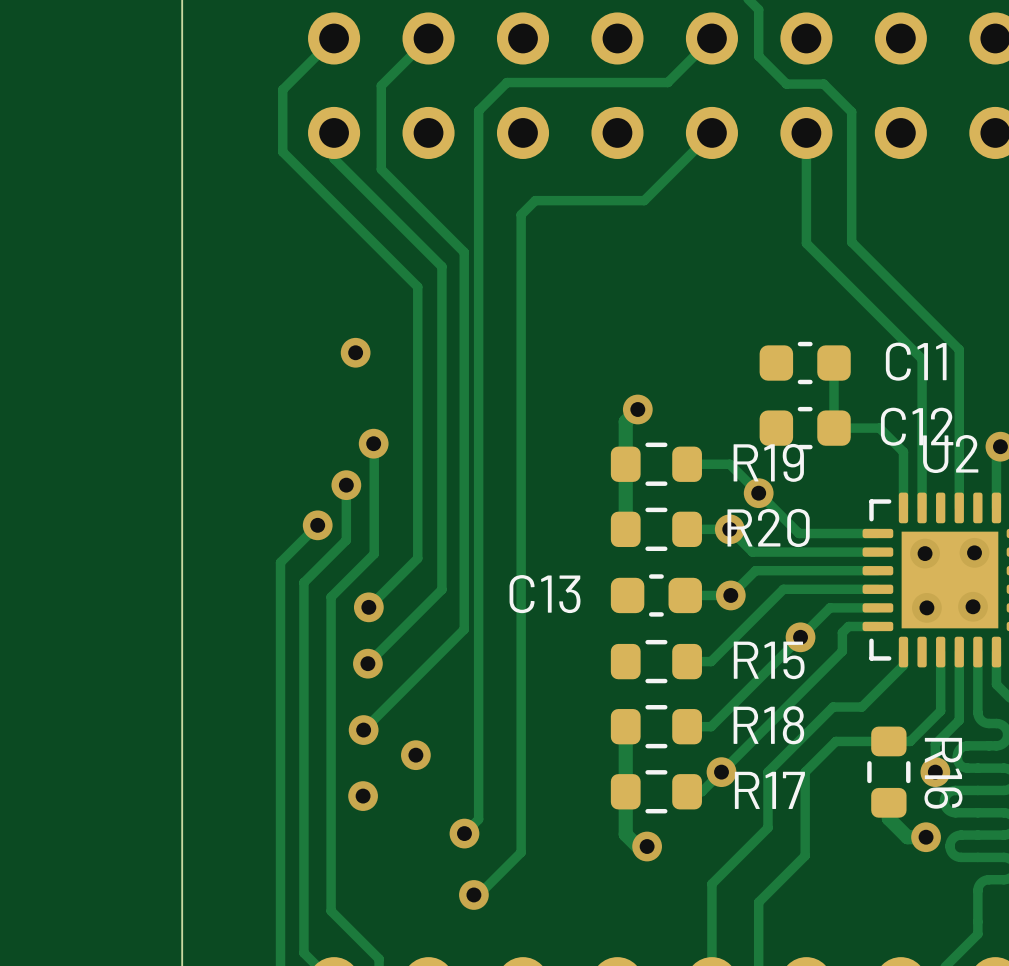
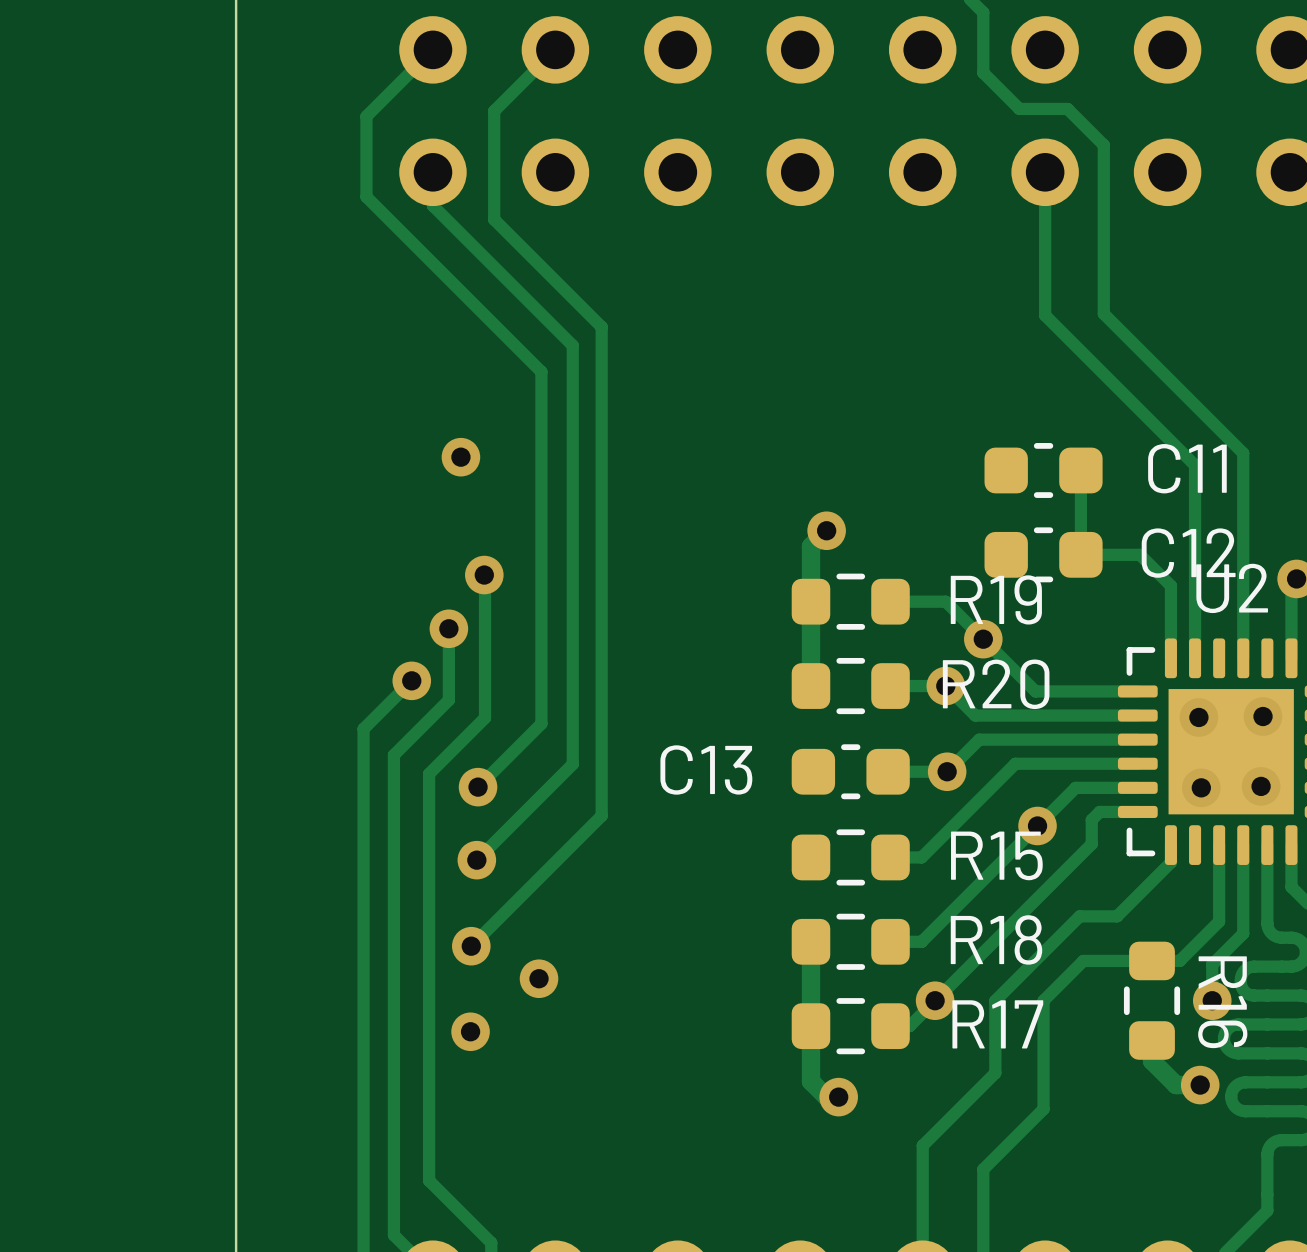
track: (711, 38) (667, 82) (506, 82) (478, 110) (478, 819) (464, 833) -> none
track: (711, 132) (644, 200) (535, 200) (521, 214) (521, 852) (478, 894) (473, 894) -> none
via: (464, 833) -> none
via: (473, 894) -> none

